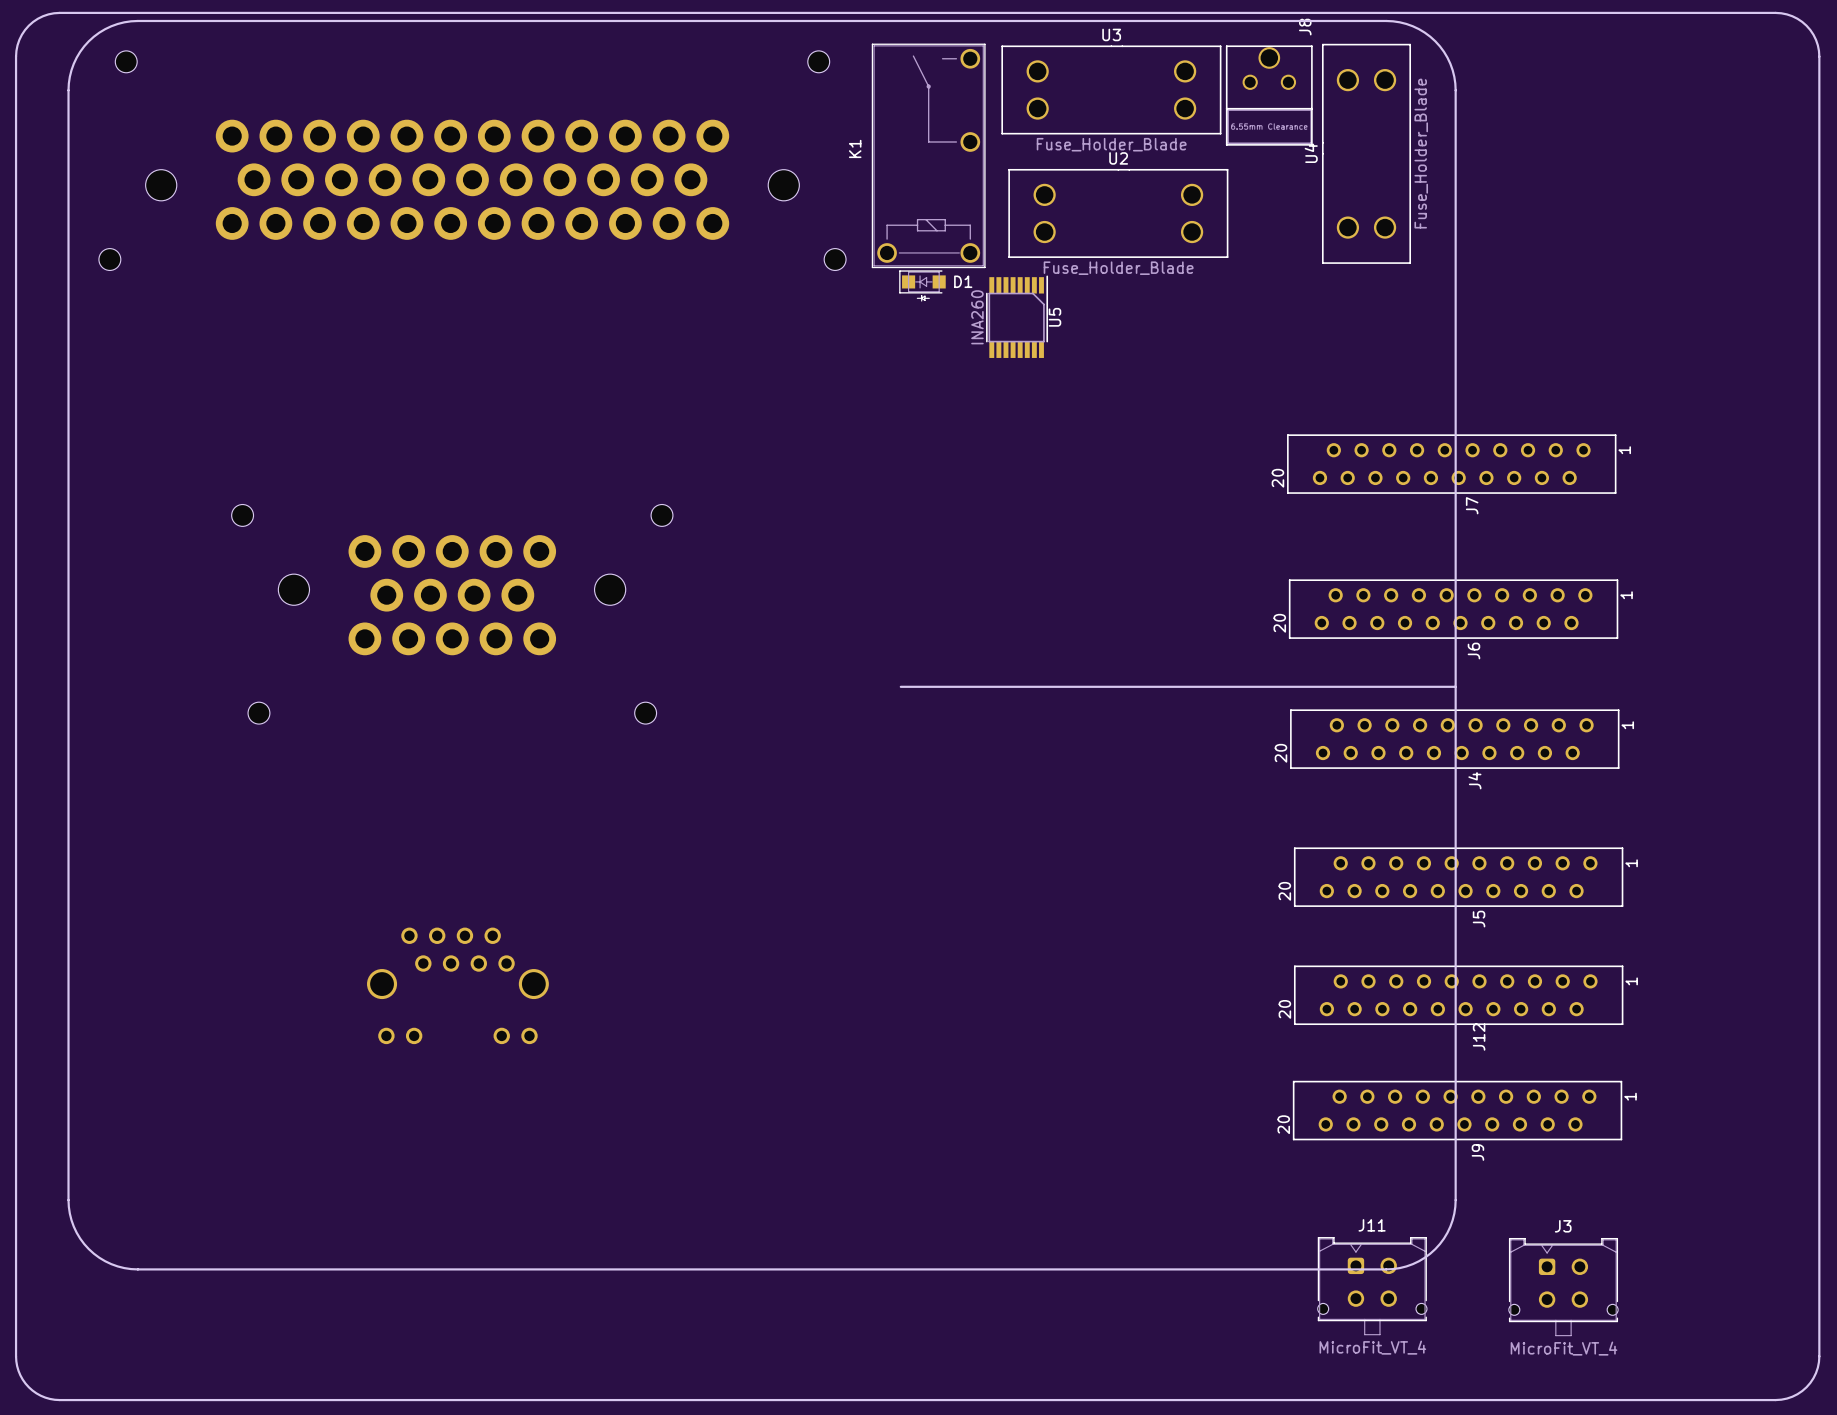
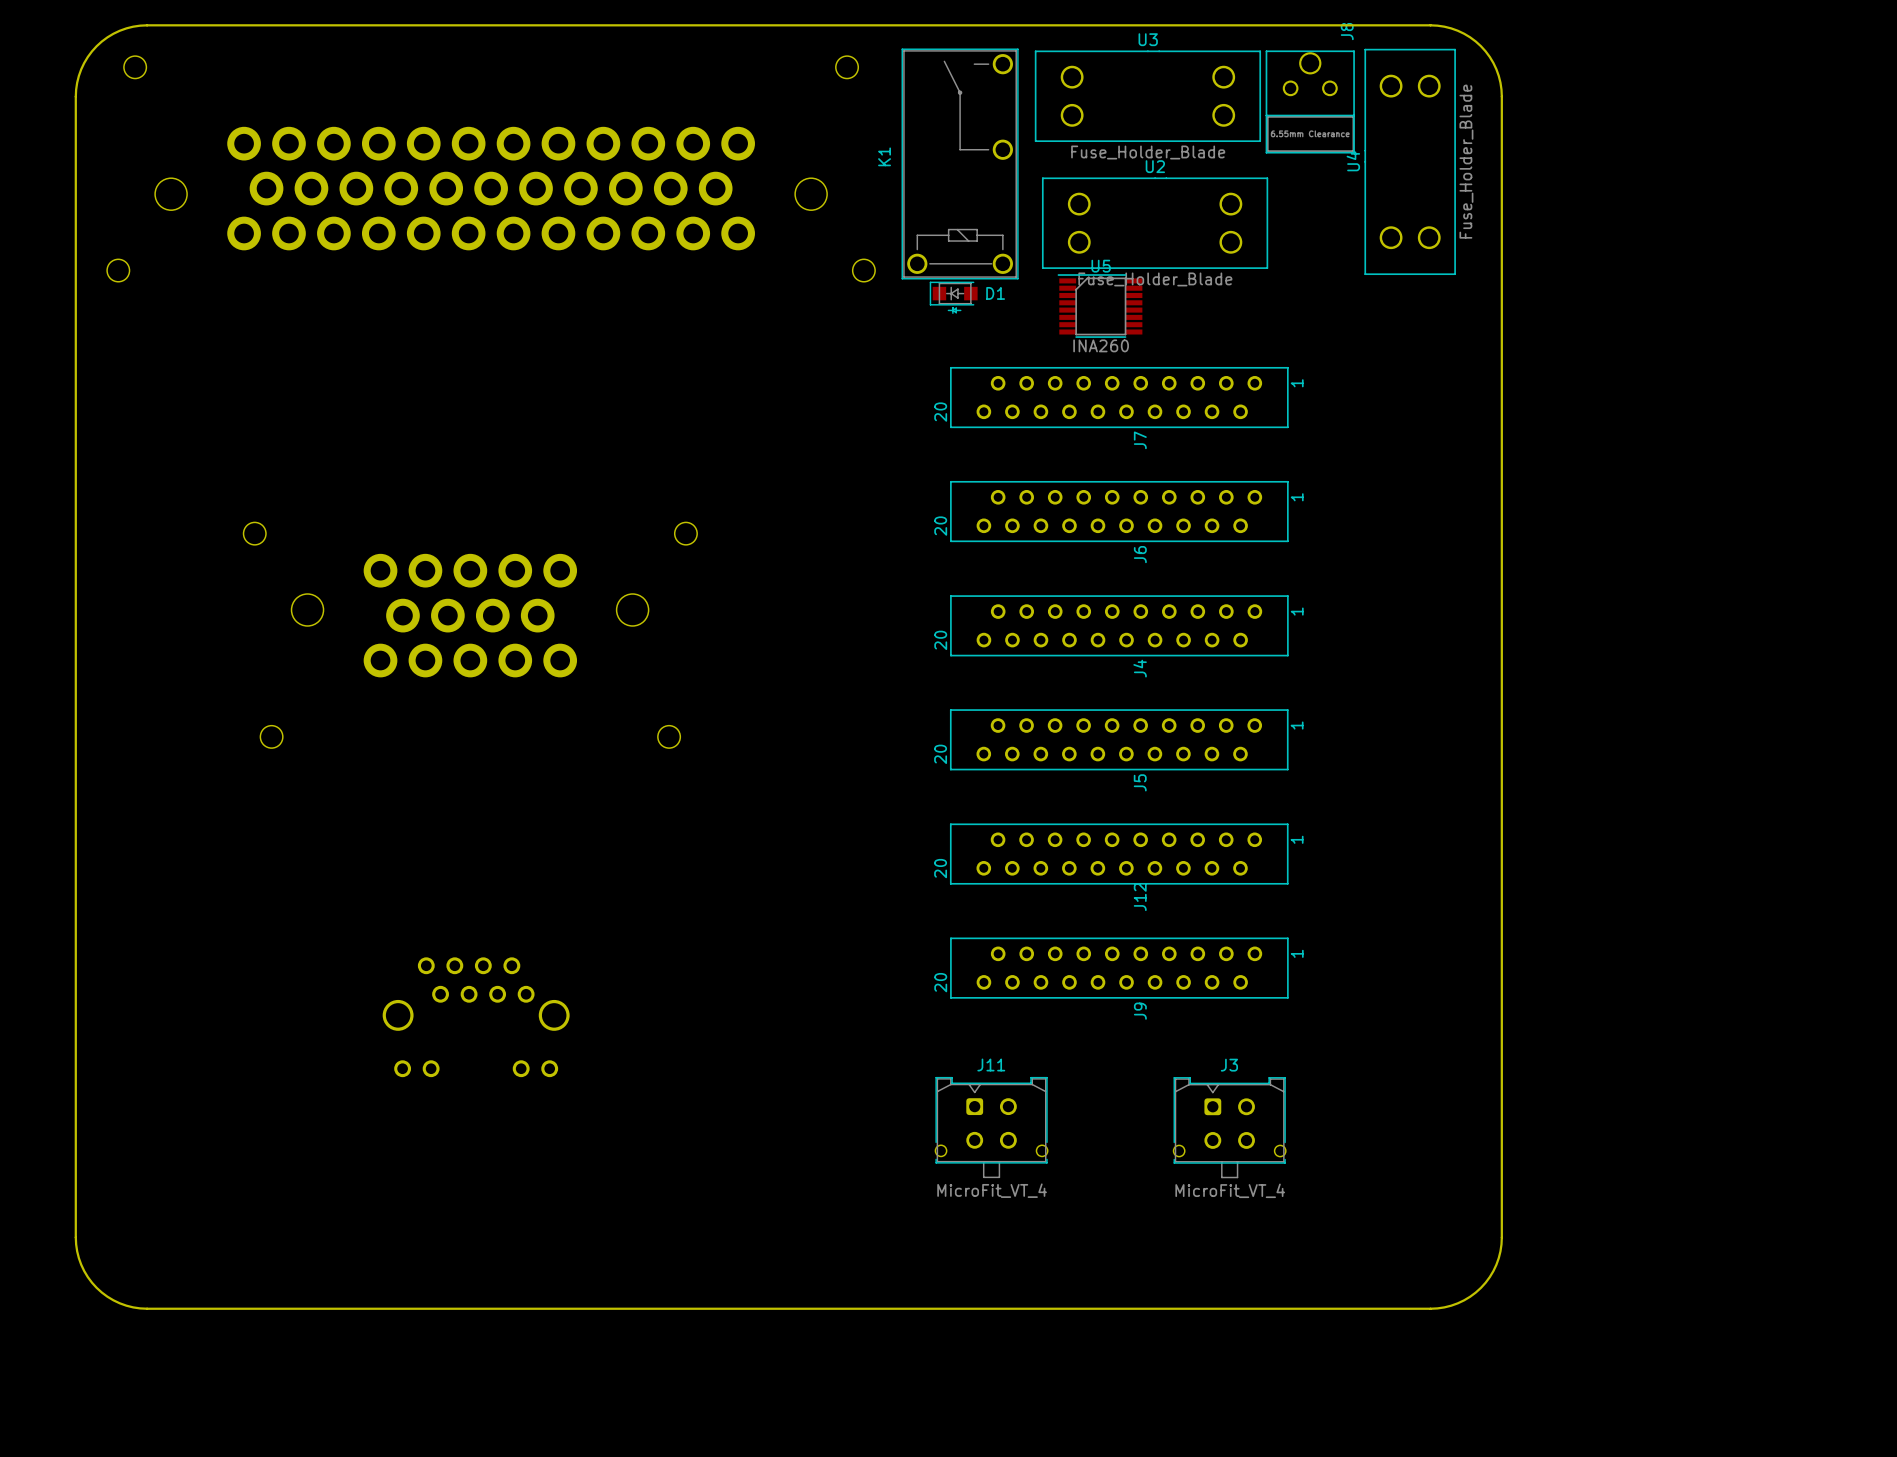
board edge: (59, 12) (1775, 12) (1792, 16) (1802, 21) (1813, 34) (1819, 56) (1819, 1356) (1816, 1373) (1810, 1382) (1797, 1394) (1775, 1400) (59, 1400) (45, 1397) (32, 1390) (20, 1375) (16, 1356) (16, 56) (19, 39) (28, 25) (43, 16) (59, 12) -> none
U5 rotation: 0° (1017, 316) -> 90° counterclockwise (1099, 306)
U5 position: (1017, 316) -> (1099, 306)
J7 position: (1451, 464) -> (1119, 397)
J6 position: (1453, 609) -> (1119, 511)
board edge: (900, 686) (1455, 686) -> none
J4 position: (1454, 739) -> (1119, 625)
J5 position: (1458, 877) -> (1119, 739)
J12 position: (1458, 995) -> (1119, 854)
J9 position: (1457, 1110) -> (1119, 968)
J11 position: (1372, 1286) -> (991, 1127)
J3 position: (1563, 1287) -> (1229, 1127)

